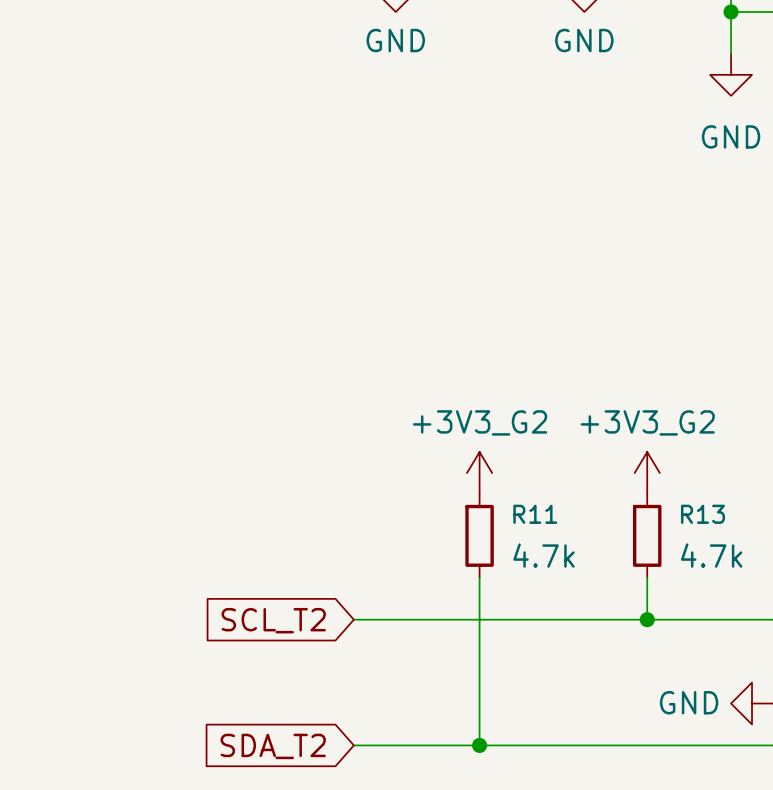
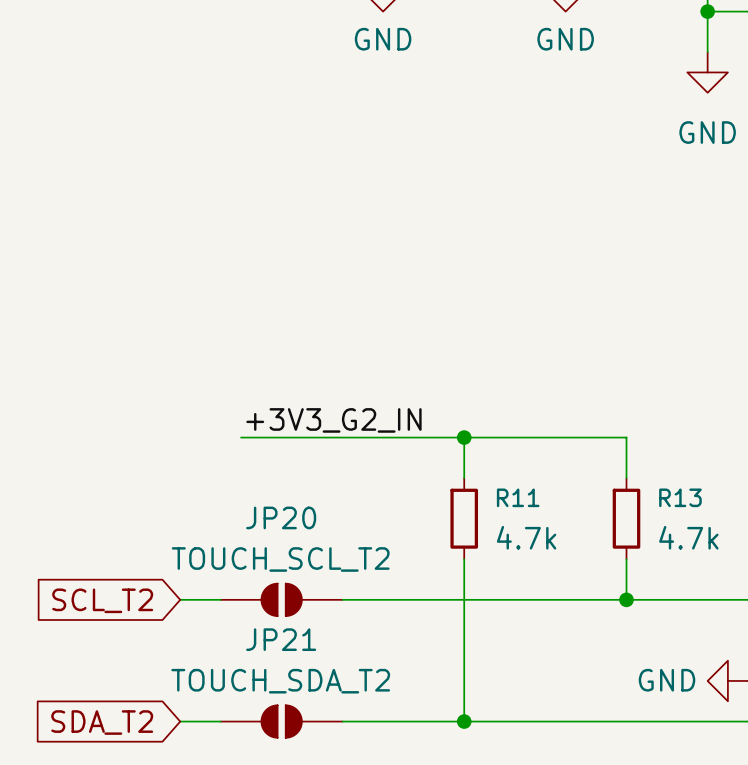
label: none -> +3V3_G2_IN (333, 420)
wire: none -> (241, 437) (626, 437) (626, 478)
junction: none -> (464, 437)
power symbol: +3V3_G2 (479, 473) -> none
power symbol: +3V3_G2 (647, 473) -> none
wire: none -> (180, 599) (220, 599)
JP20: none -> TOUCH_SCL_T2 (281, 599)
global label position: SCL_T2 (273, 620) -> SCL_T2 (102, 600)
wire: none -> (180, 721) (220, 721)
JP21: none -> TOUCH_SDA_T2 (281, 721)
global label position: SDA_T2 (273, 746) -> SDA_T2 (102, 722)

